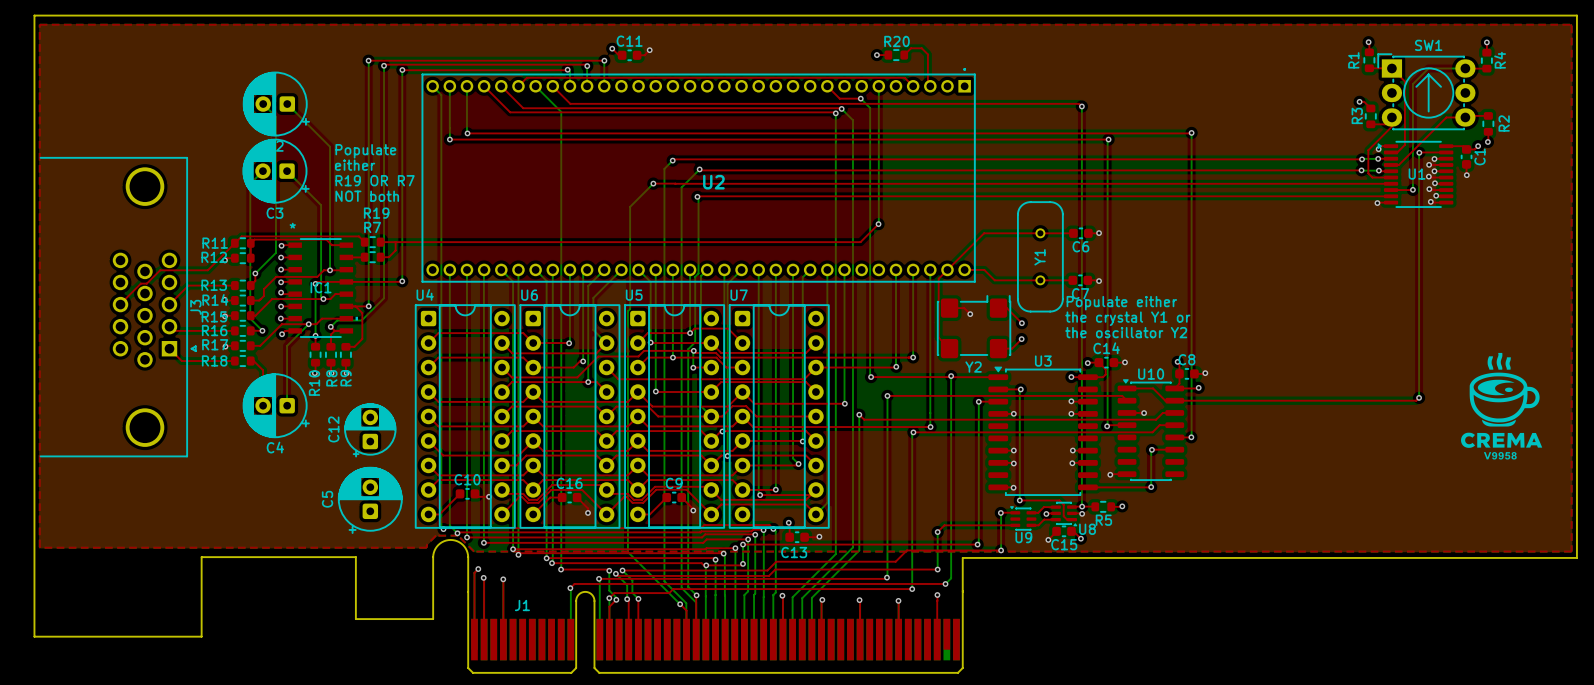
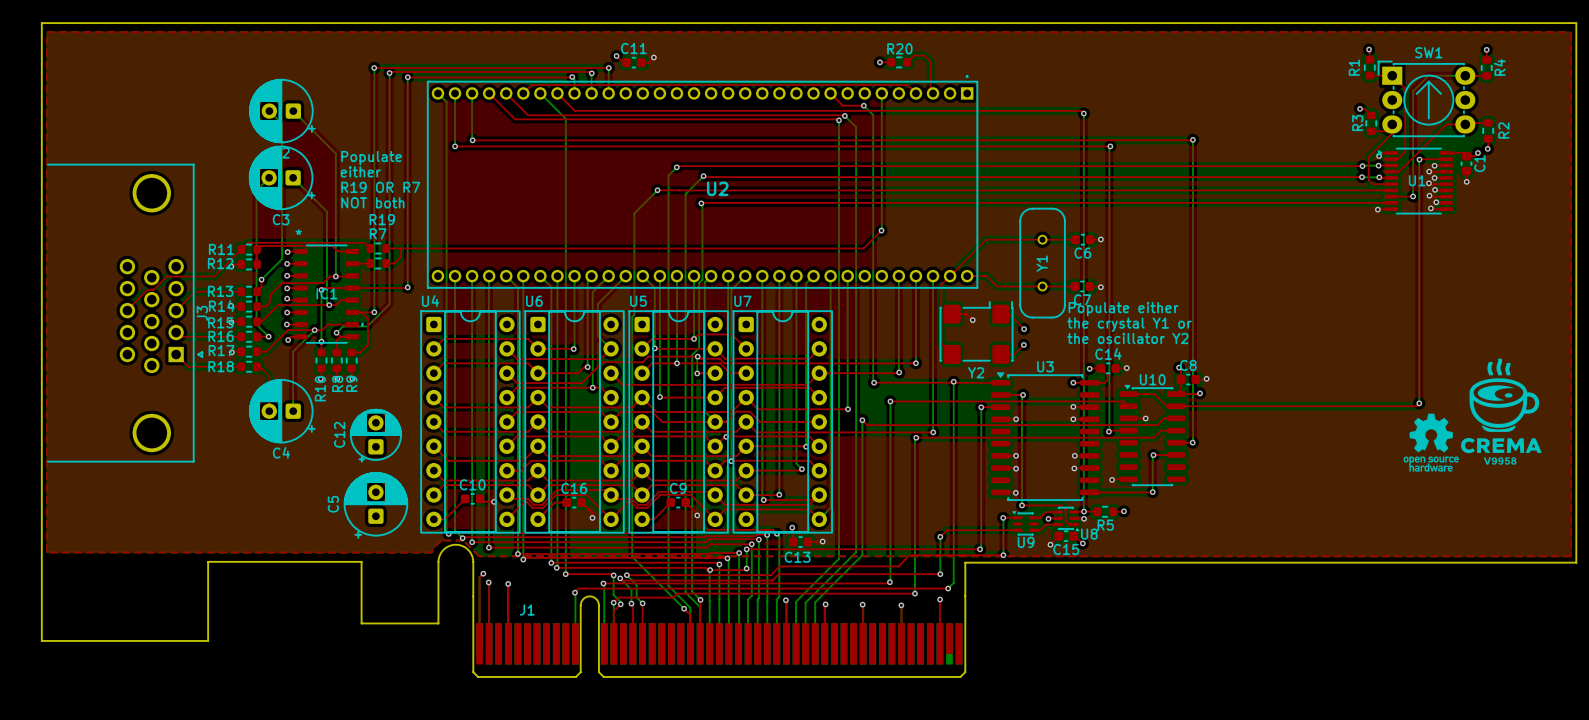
drawing: none -> [1403, 413, 1459, 472]

